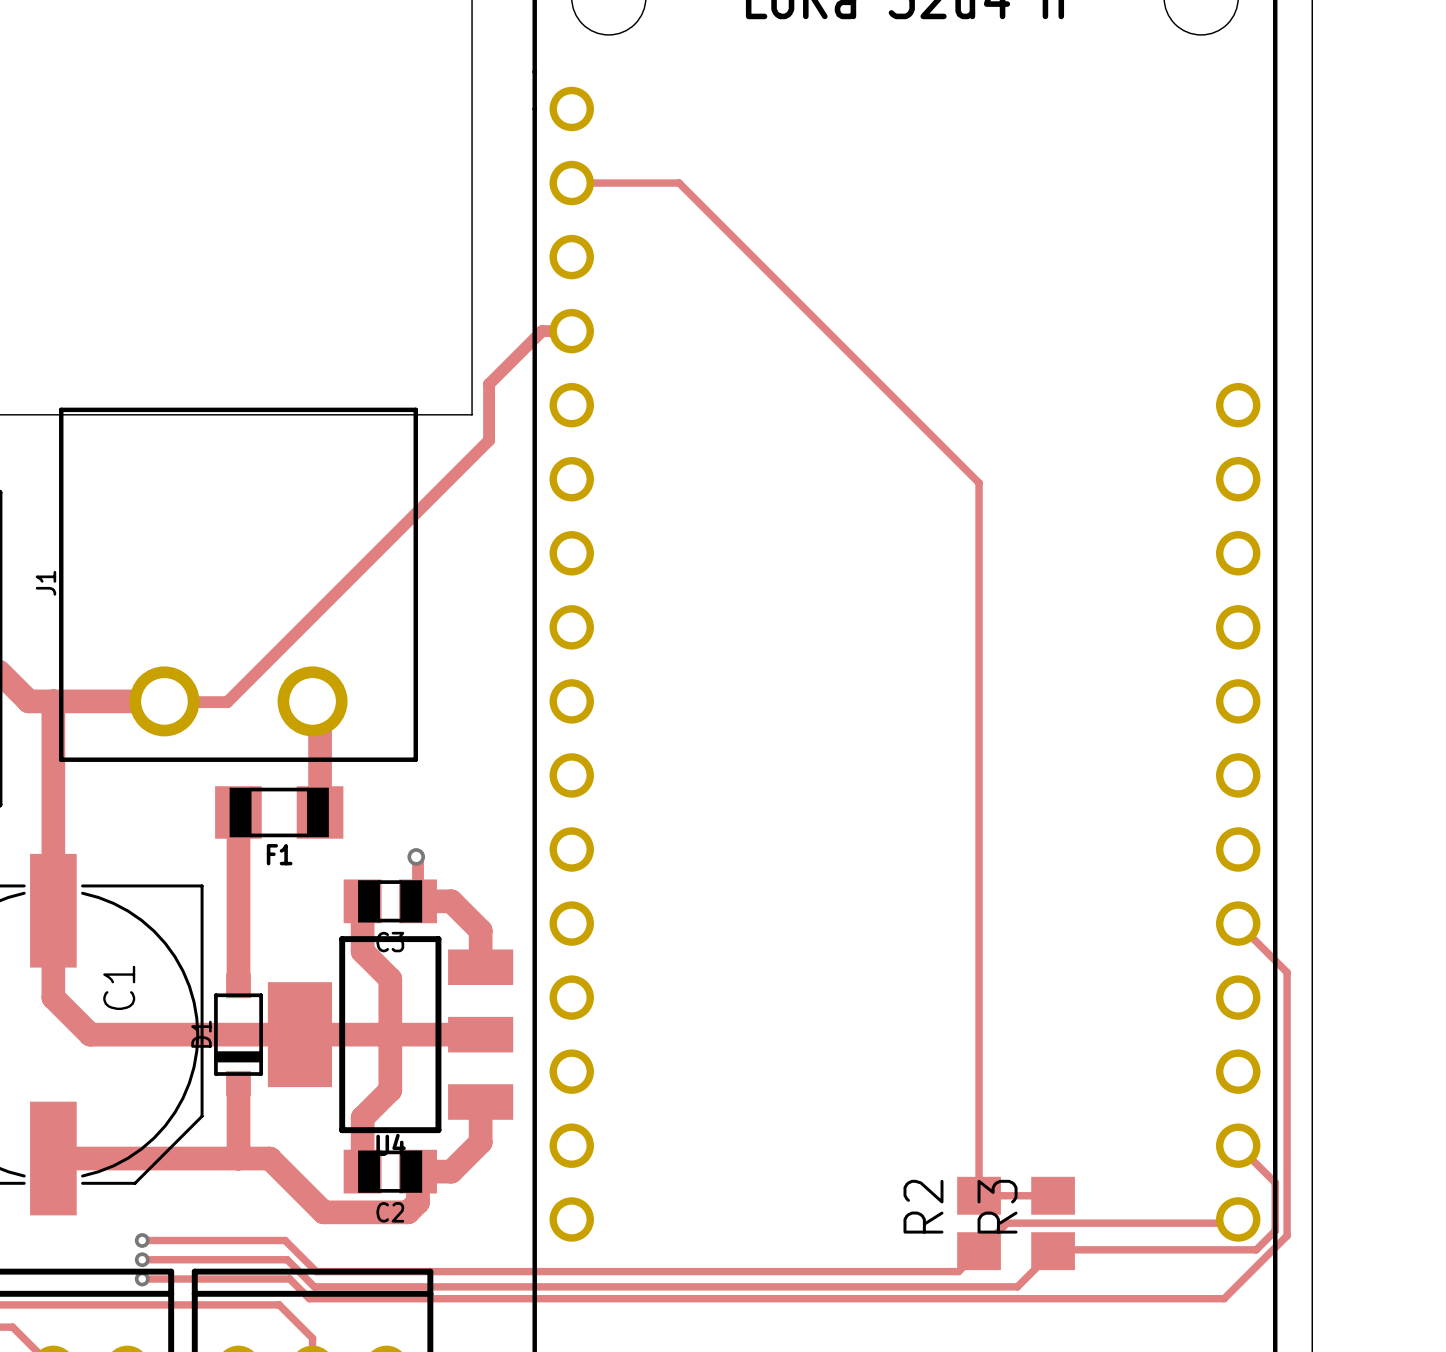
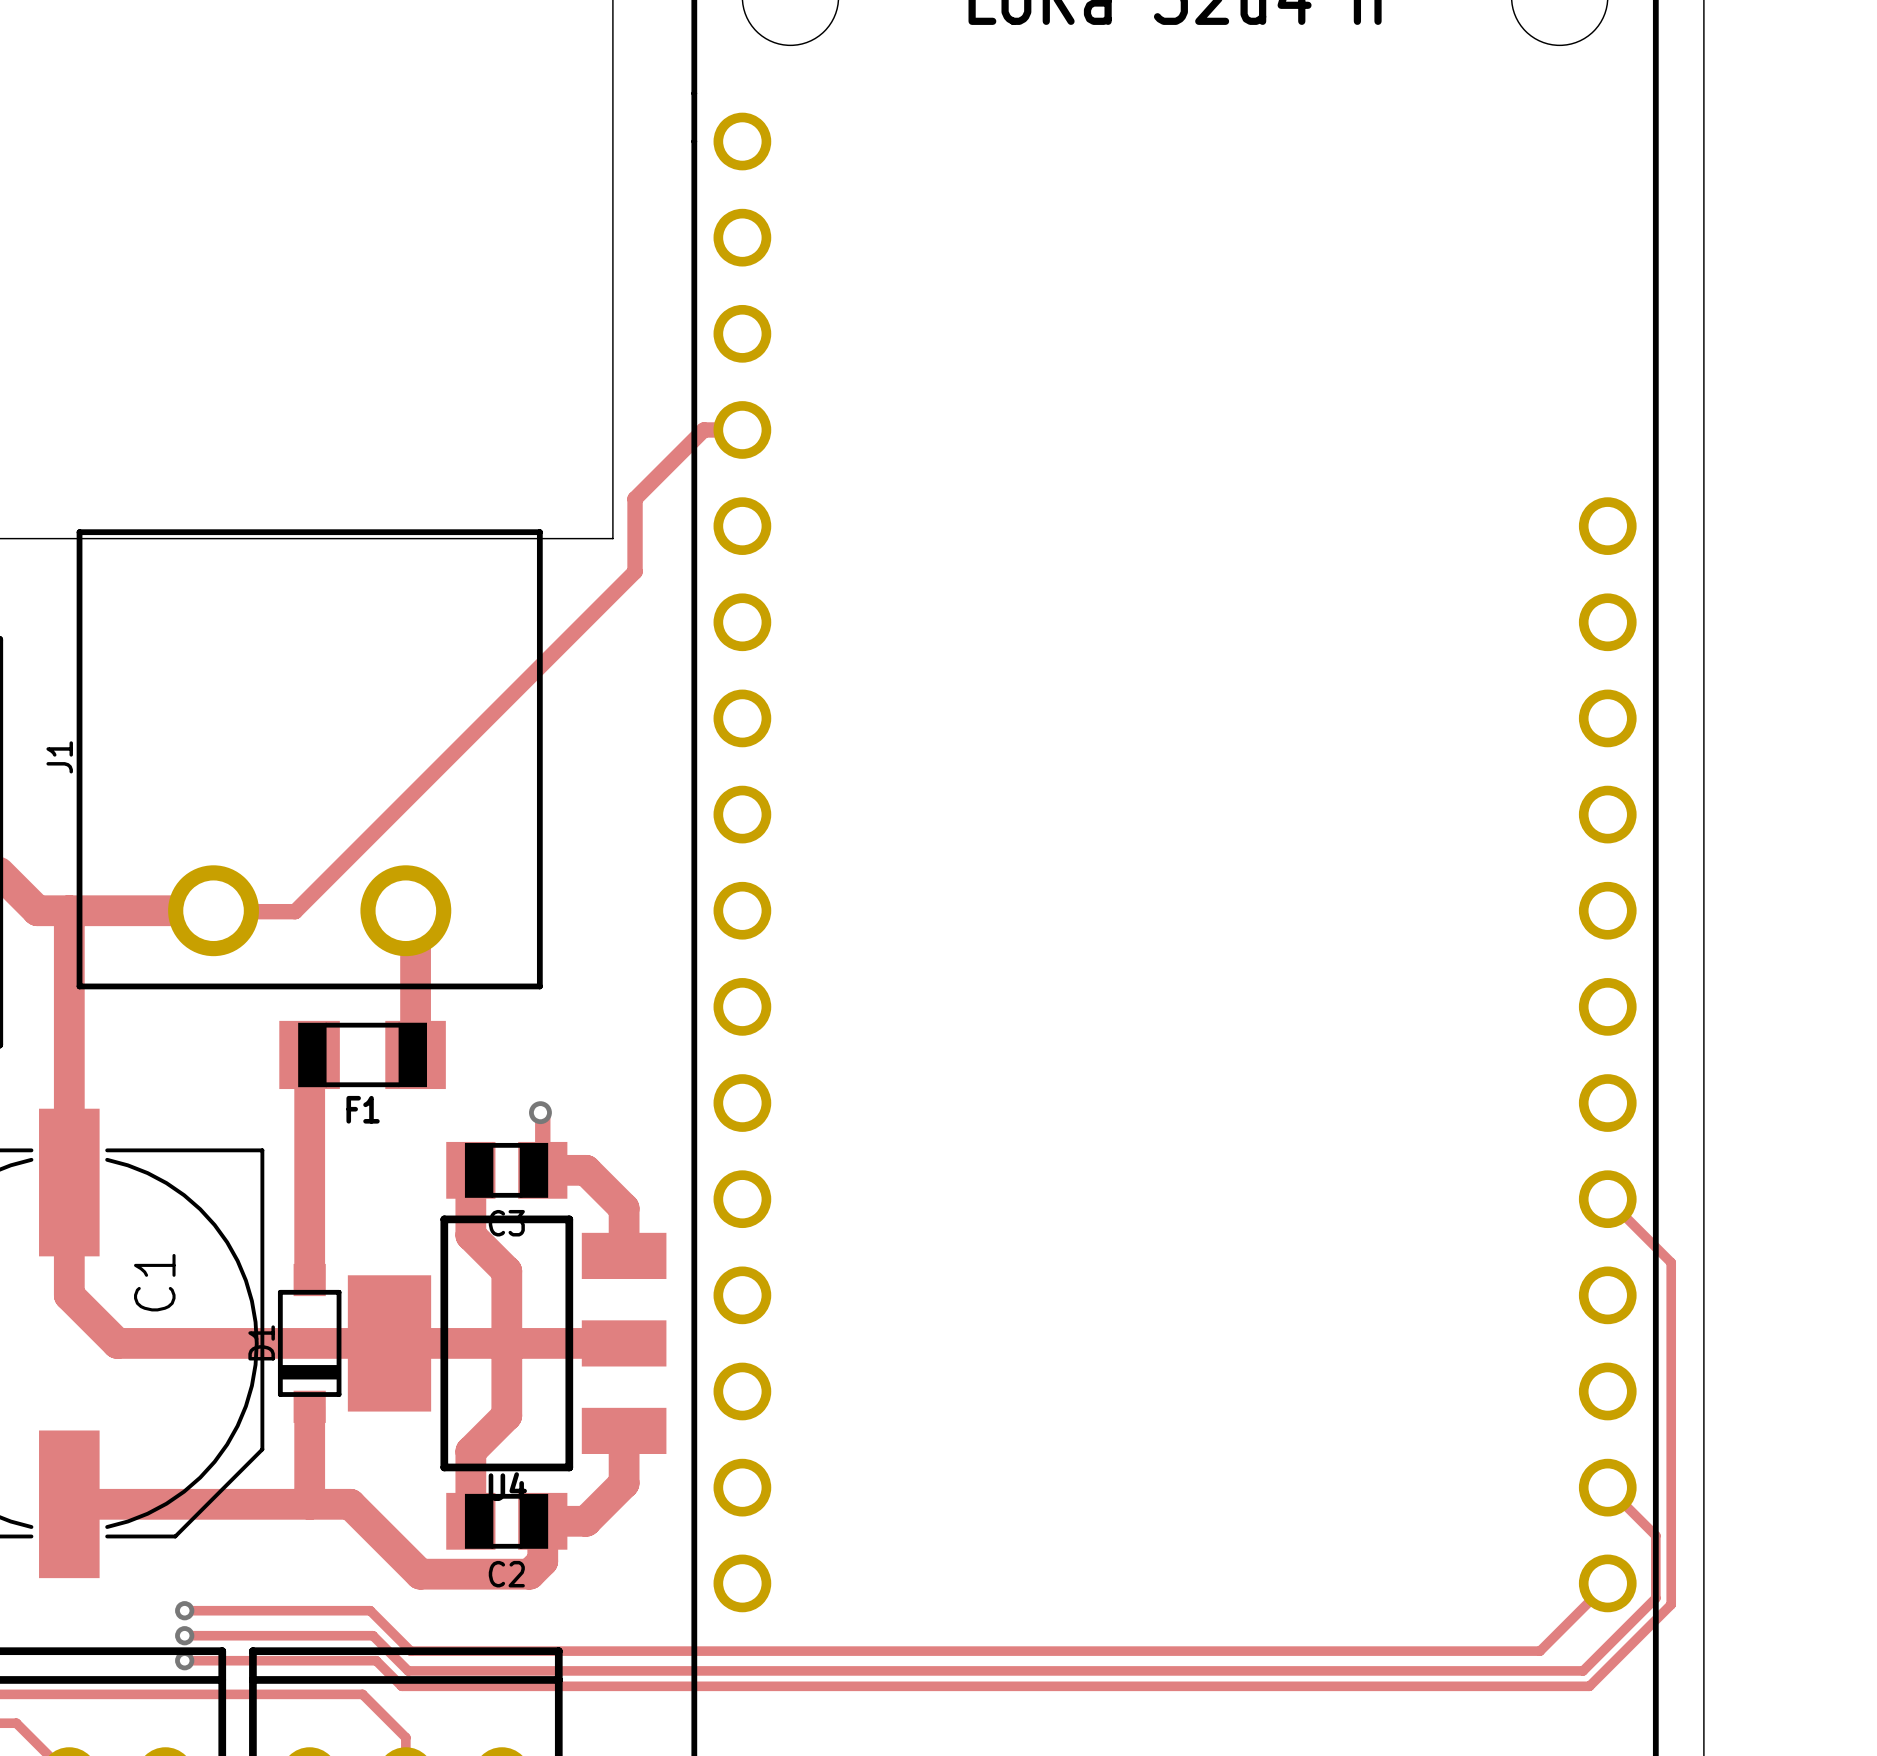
track: (571, 183) (679, 183) (979, 482) (979, 1195) (1053, 1195) -> none
R2: (979, 1223) -> none
R3: (1053, 1223) -> none
track: (1234, 1223) (1007, 1223) (958, 1271) -> (1602, 1588) (1540, 1651) (1244, 1651)
track: (1256, 1249) (1054, 1249) (1017, 1286) -> (1631, 1622) (1583, 1670) (1321, 1670)

